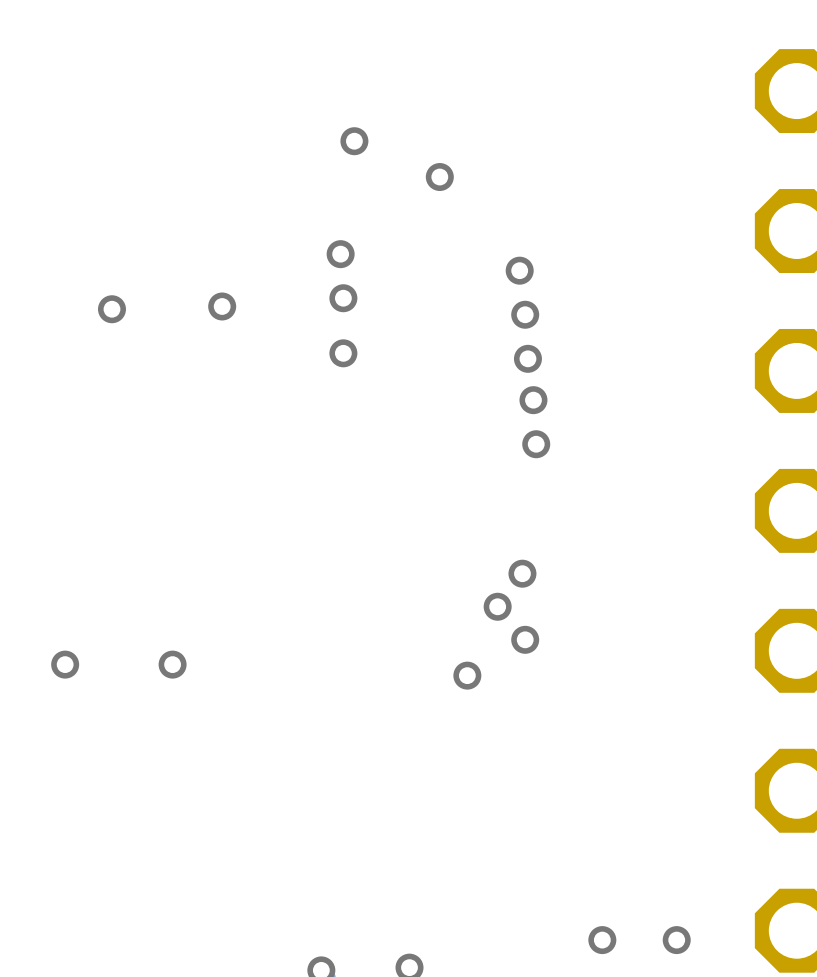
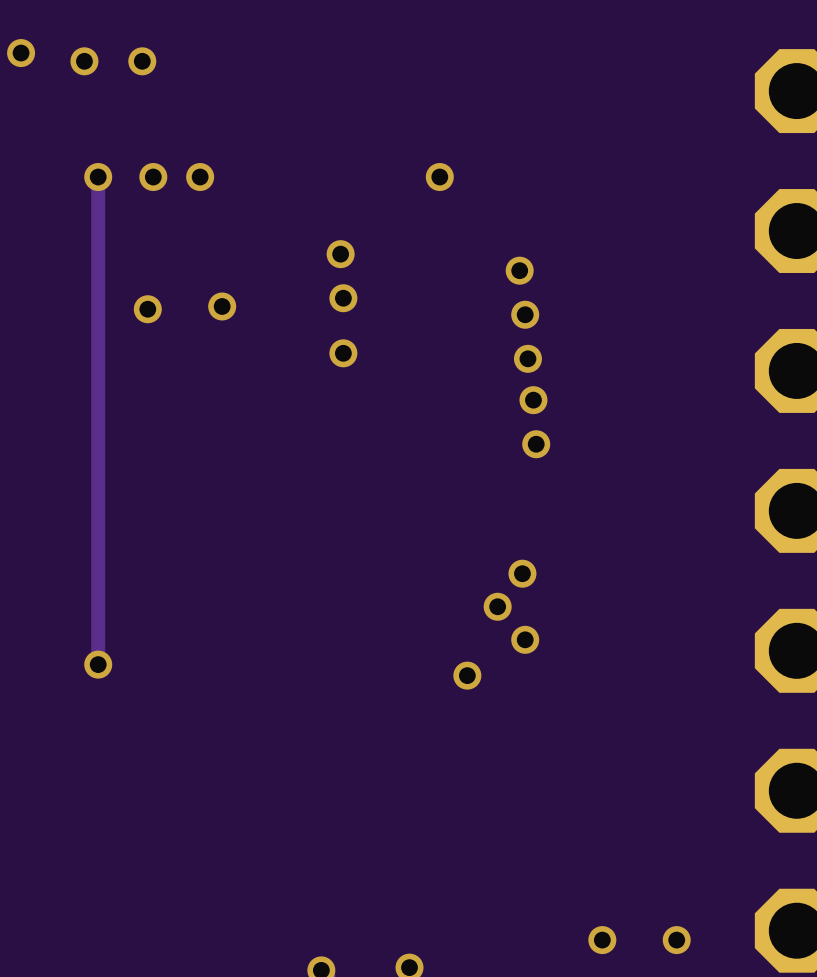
via: none -> (21, 53)
via: none -> (84, 61)
via: none -> (142, 61)
via: (354, 141) -> none
track: none -> (98, 177) (98, 664)
via: none -> (98, 177)
via: none -> (153, 177)
via: none -> (200, 177)
via position: (111, 309) -> (147, 309)
via position: (65, 664) -> (98, 664)
via: (172, 664) -> none

